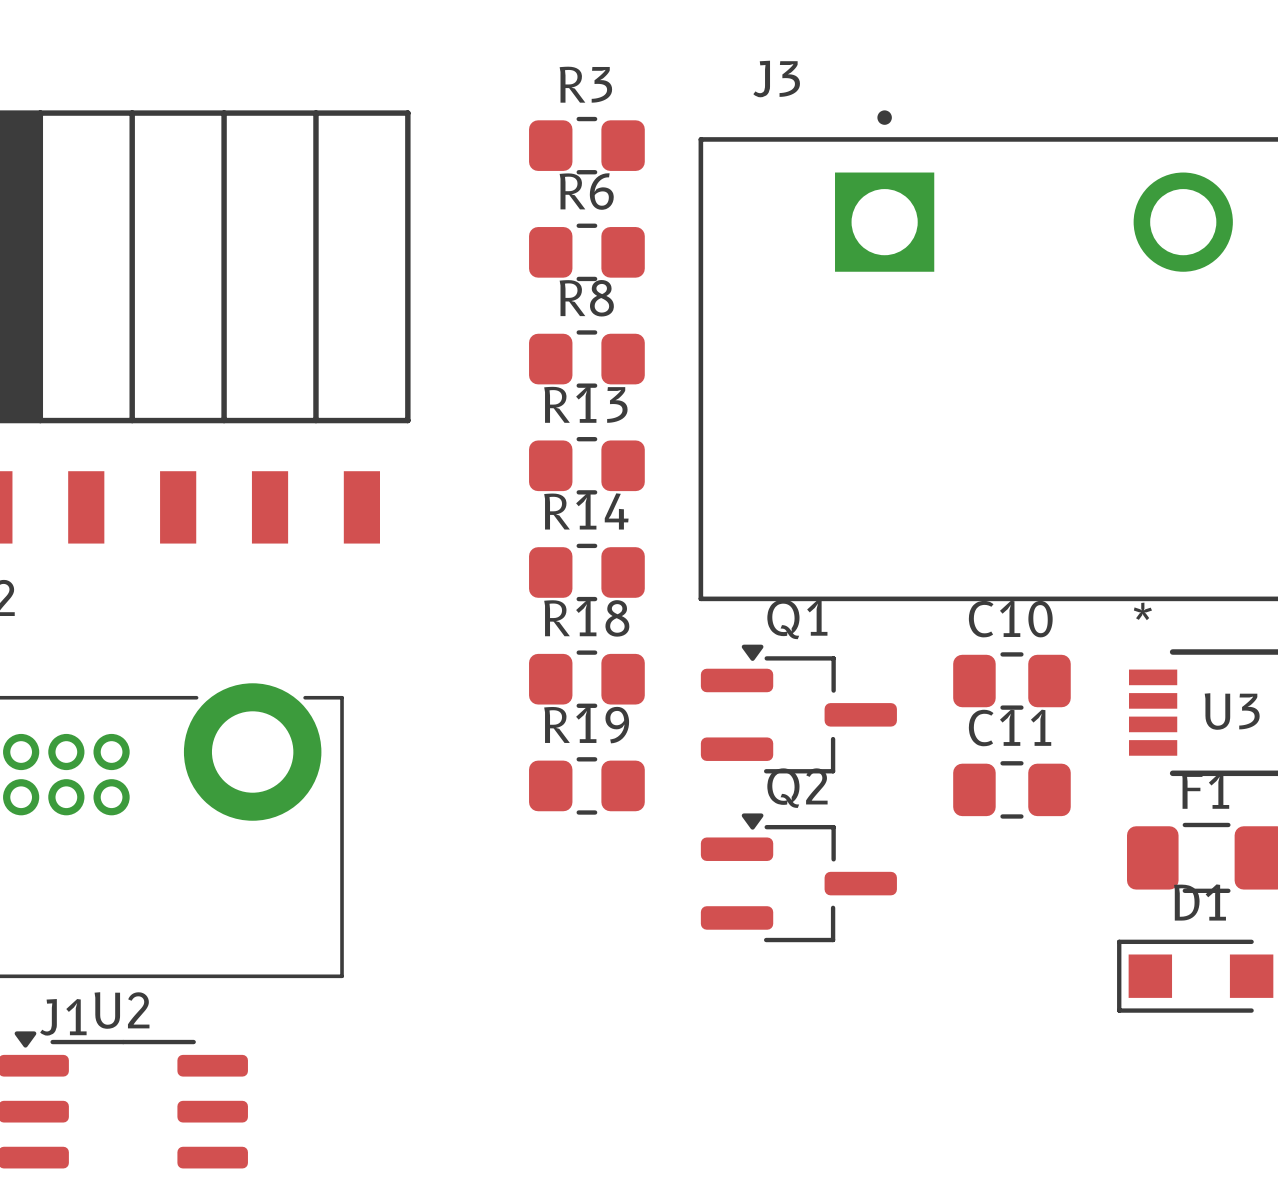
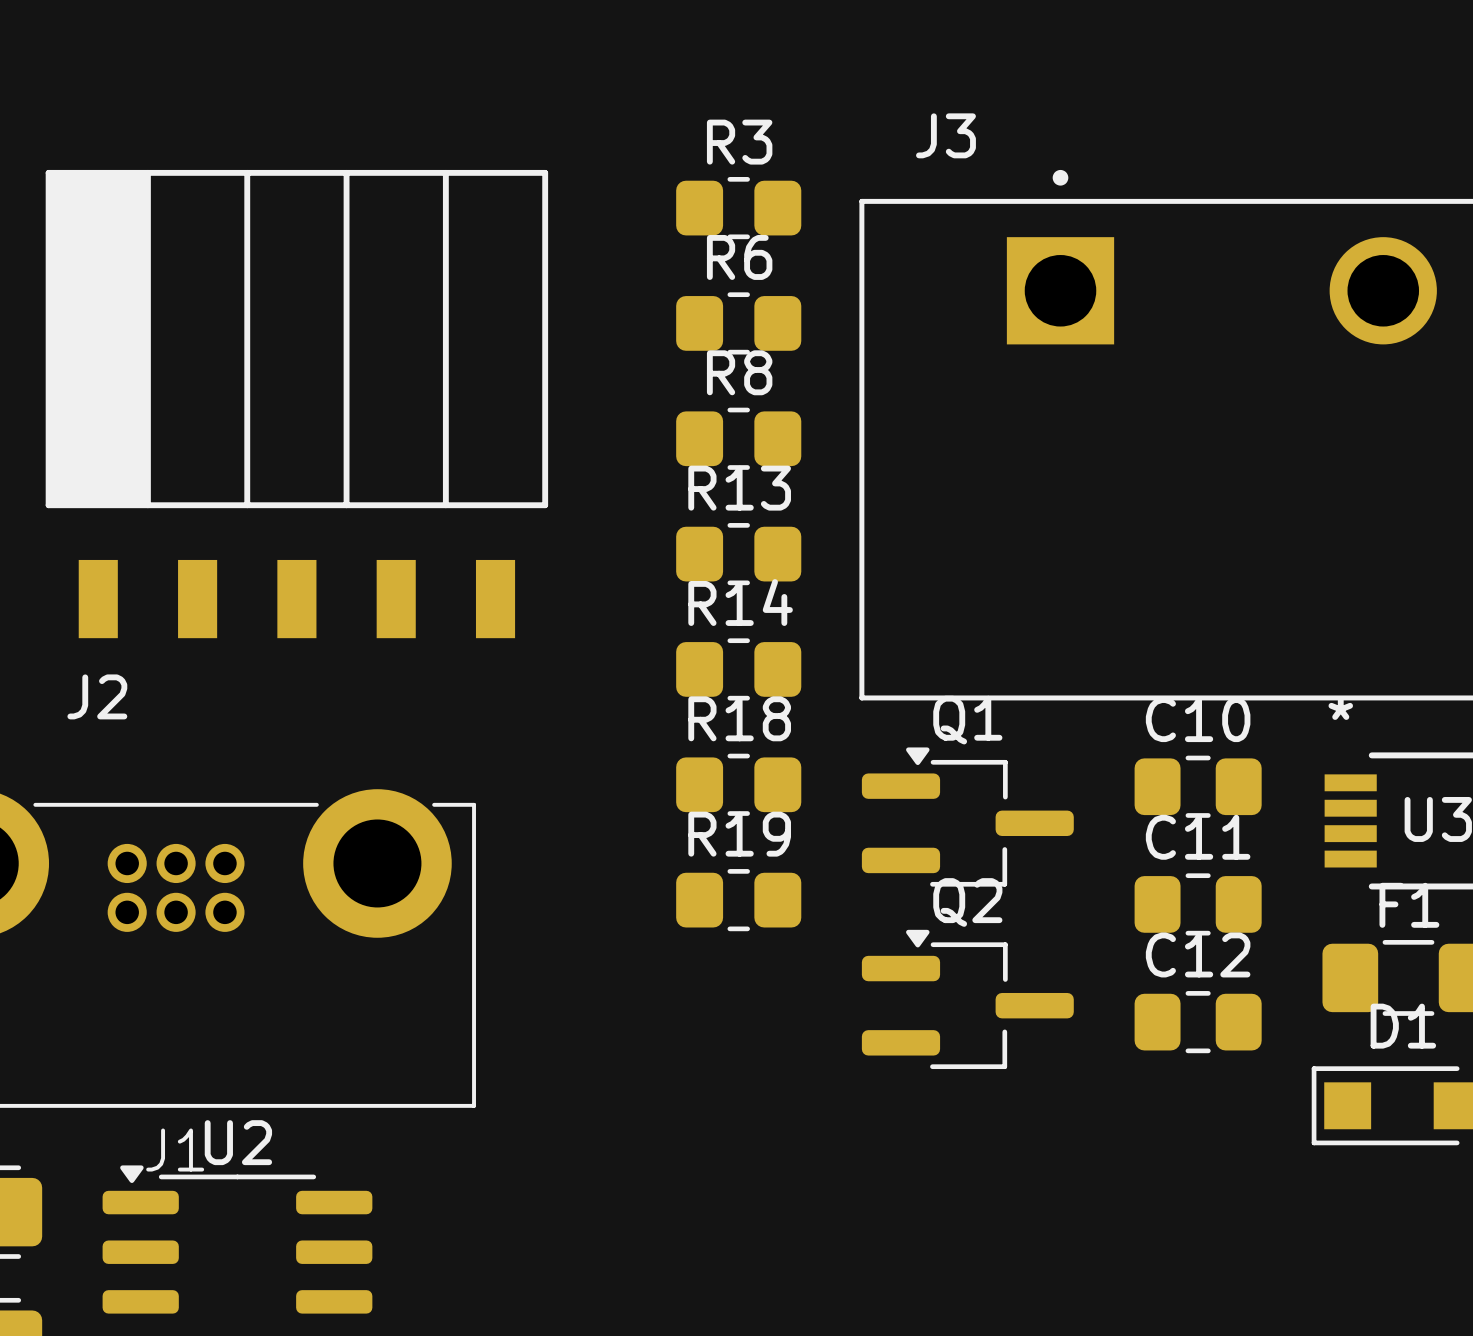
C12: none -> (1198, 1022)

